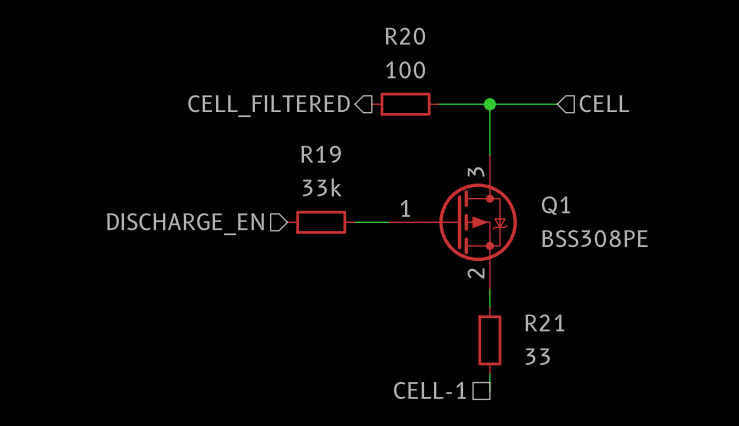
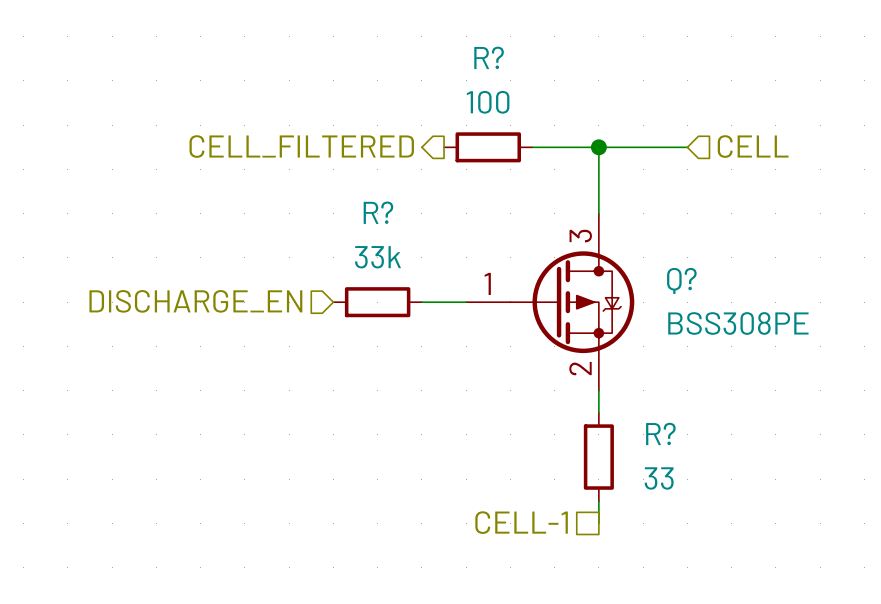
R20 name: R20 (405, 36) -> R? (489, 57)
R19 name: R19 (321, 154) -> R? (378, 212)
Q1 name: Q1 (555, 205) -> Q? (681, 280)
R21 name: R21 (544, 322) -> R? (660, 433)

